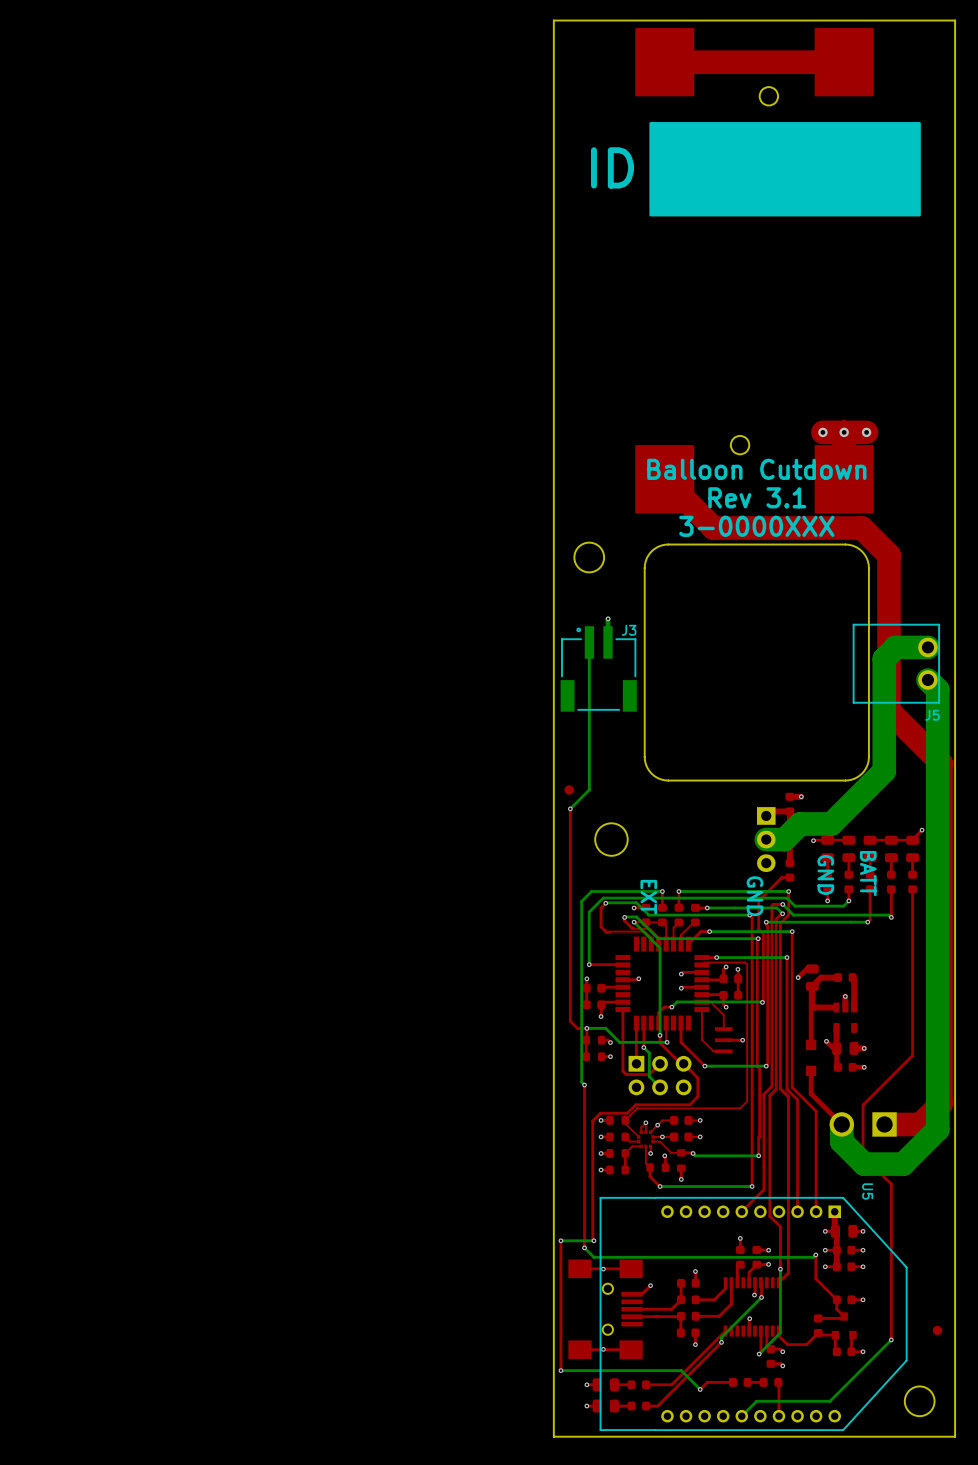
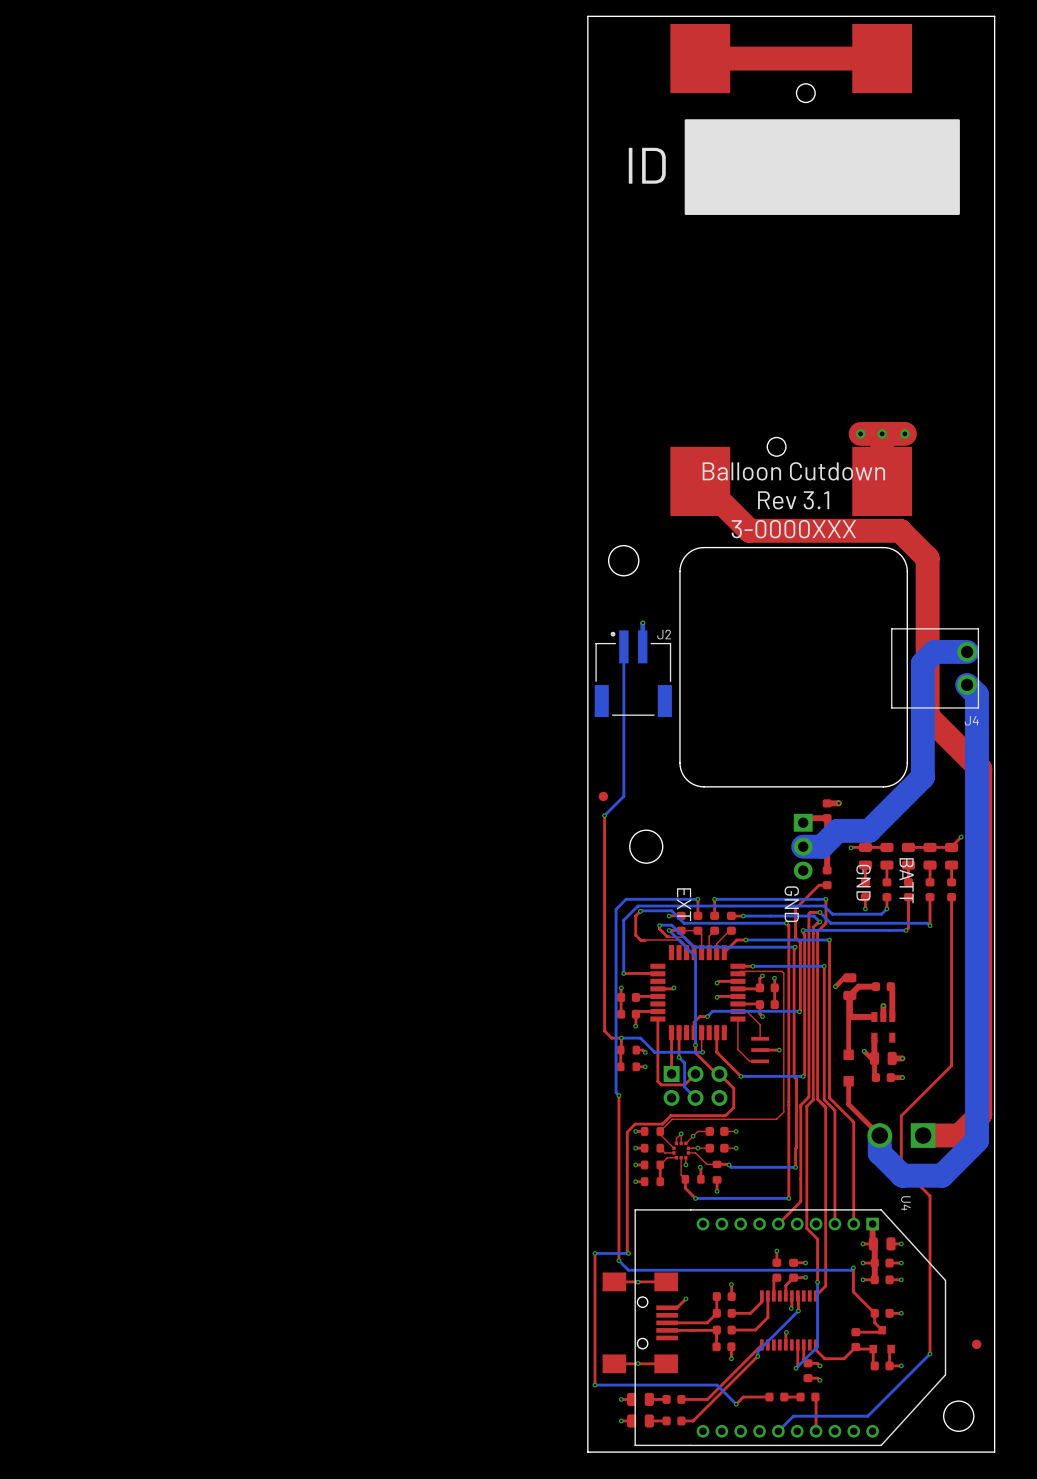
J3 name: J3 (629, 630) -> J2 (664, 634)
J5 name: J5 (932, 715) -> J4 (971, 720)
U5 name: U5 (867, 1191) -> U4 (905, 1203)

